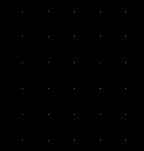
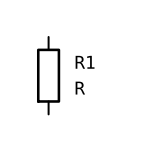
R1: none -> R (48, 75)

